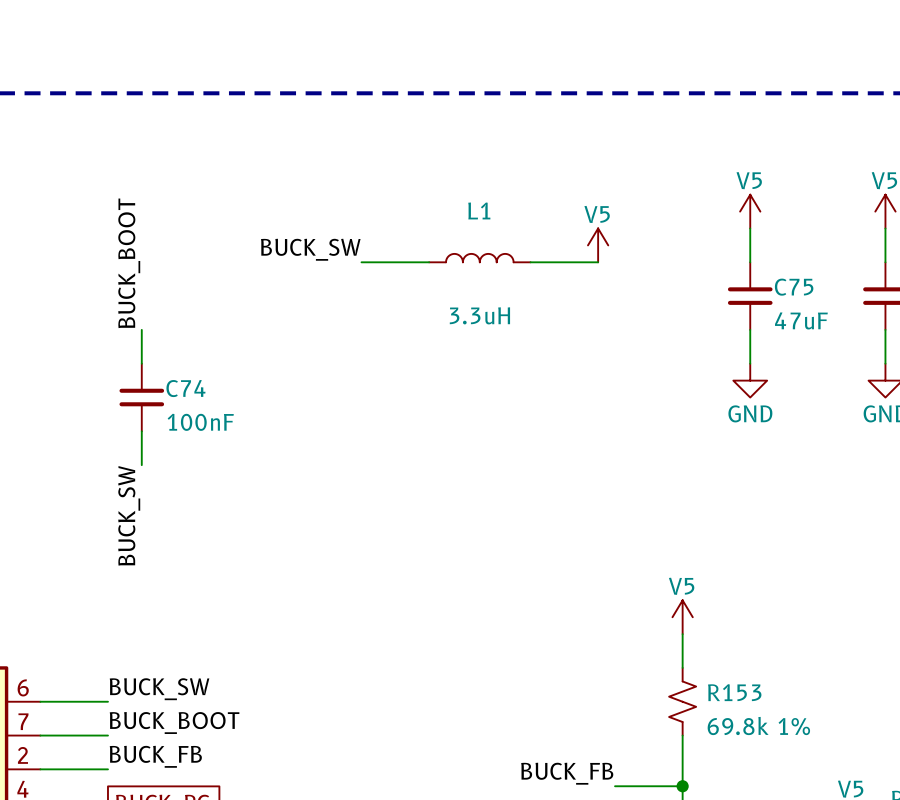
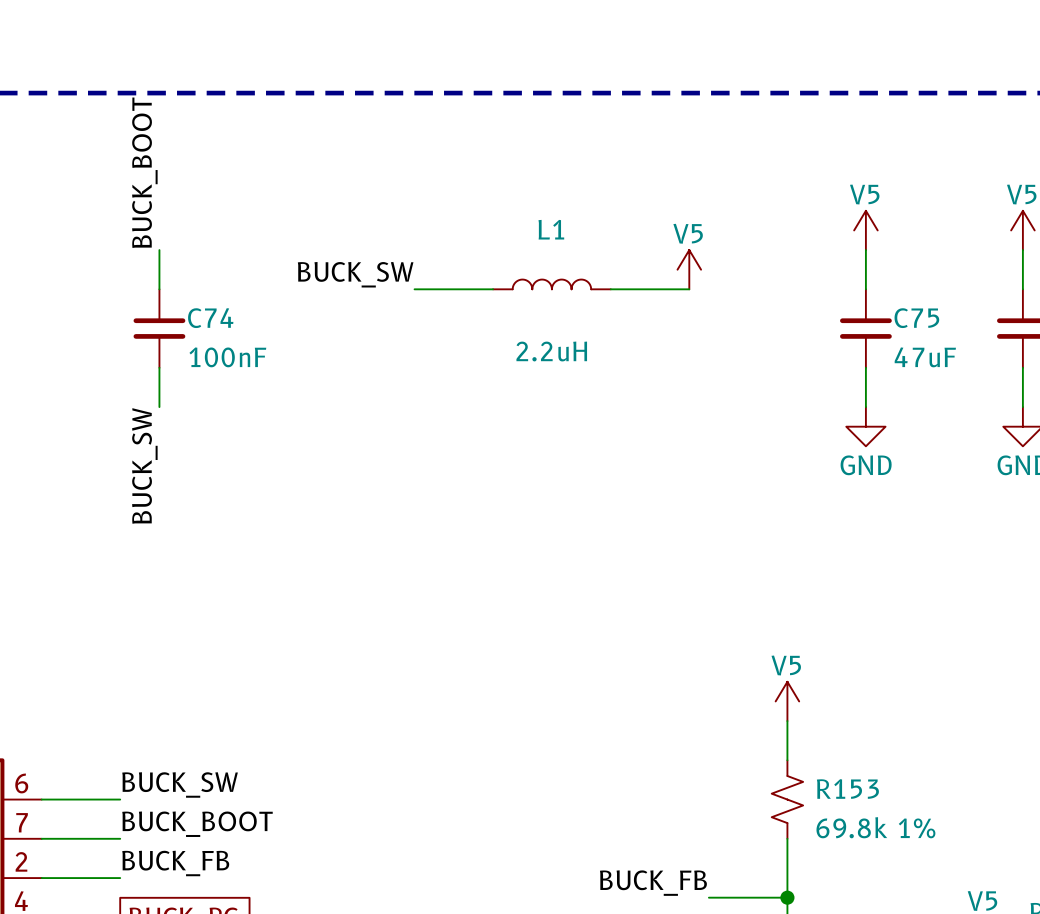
label position: BUCK_BOOT (129, 263) -> BUCK_BOOT (144, 172)
L1 value: 3.3uH (479, 315) -> 2.2uH (551, 351)
C74 position: (141, 397) -> (159, 328)
wire: (141, 431) (141, 465) -> (159, 250) (159, 289)
label position: BUCK_SW (129, 515) -> BUCK_SW (144, 465)

